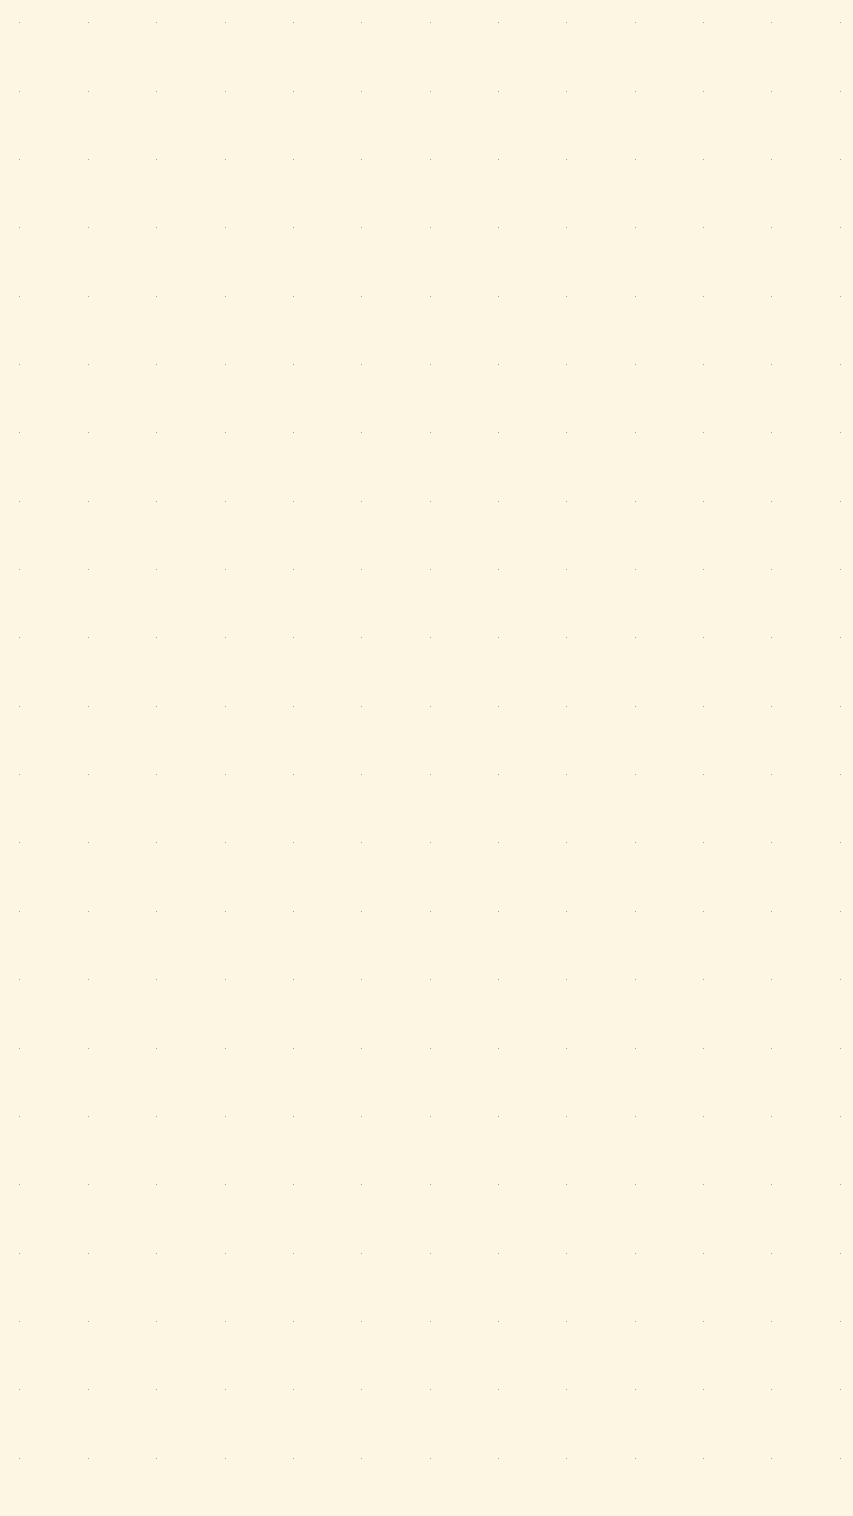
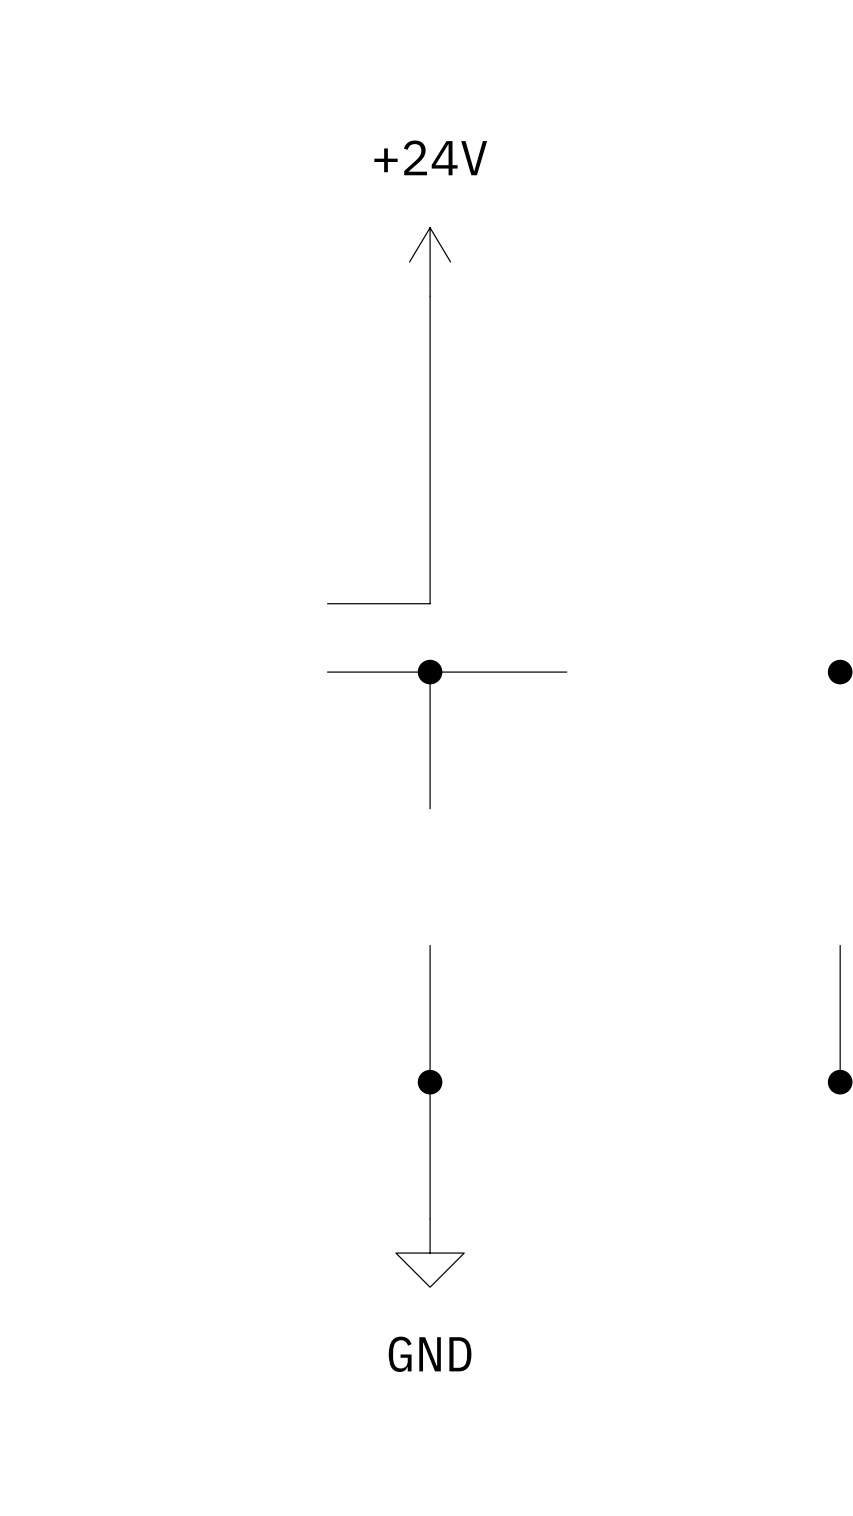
power symbol: none -> +24V (430, 261)
wire: none -> (430, 296) (430, 603) (327, 603)
wire: none -> (327, 672) (566, 672)
wire: none -> (430, 672) (430, 808)
junction: none -> (430, 672)
junction: none -> (840, 672)
wire: none -> (430, 945) (430, 1218)
wire: none -> (840, 945) (840, 1082)
junction: none -> (430, 1082)
junction: none -> (840, 1082)
power symbol: none -> GND (430, 1253)

